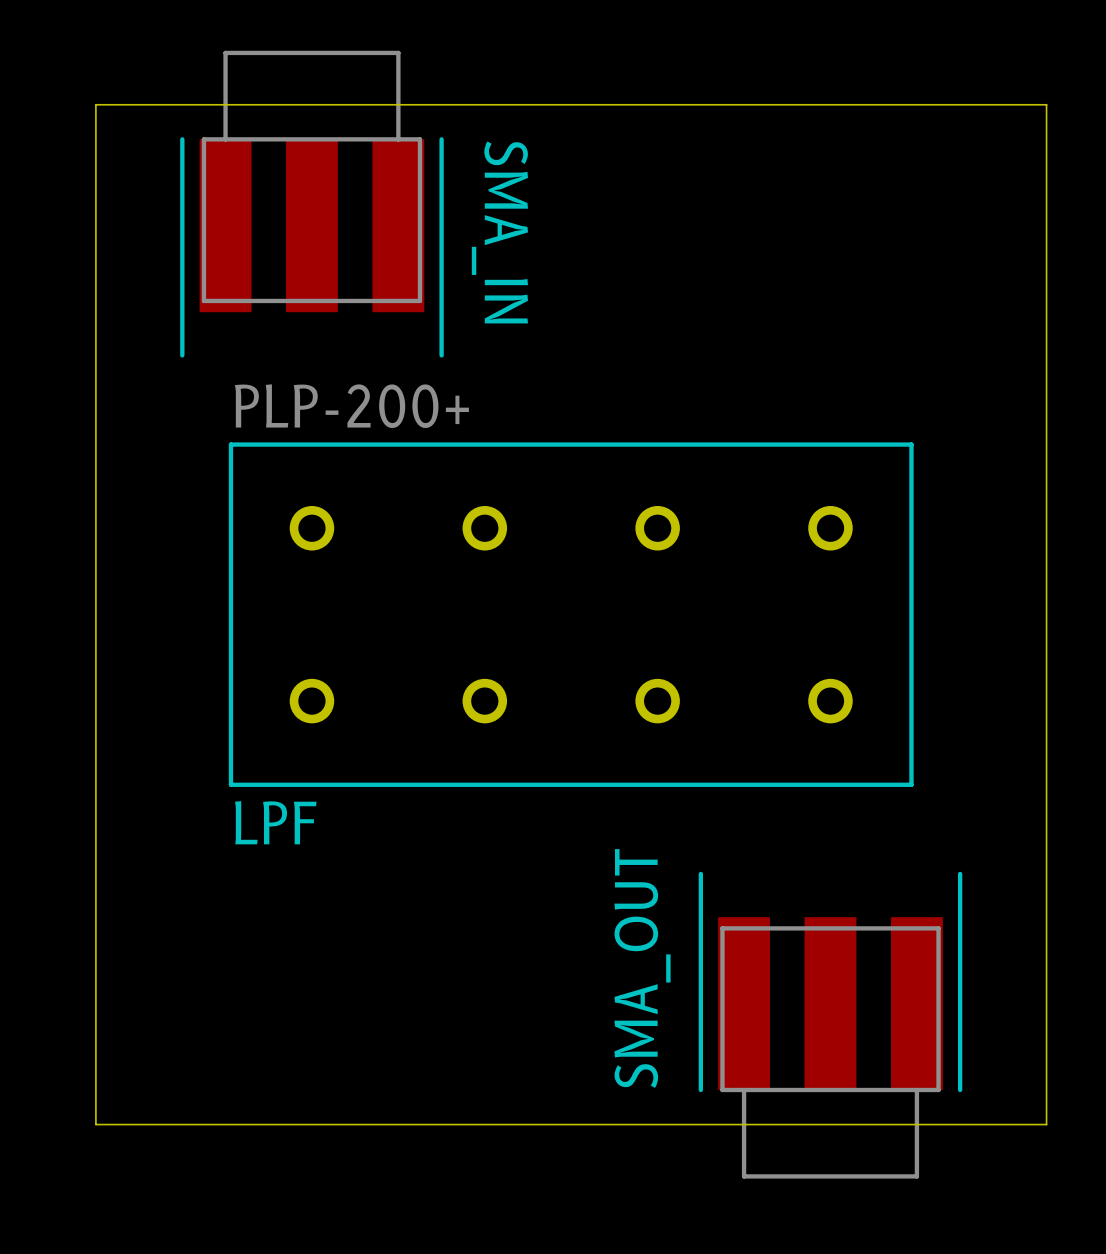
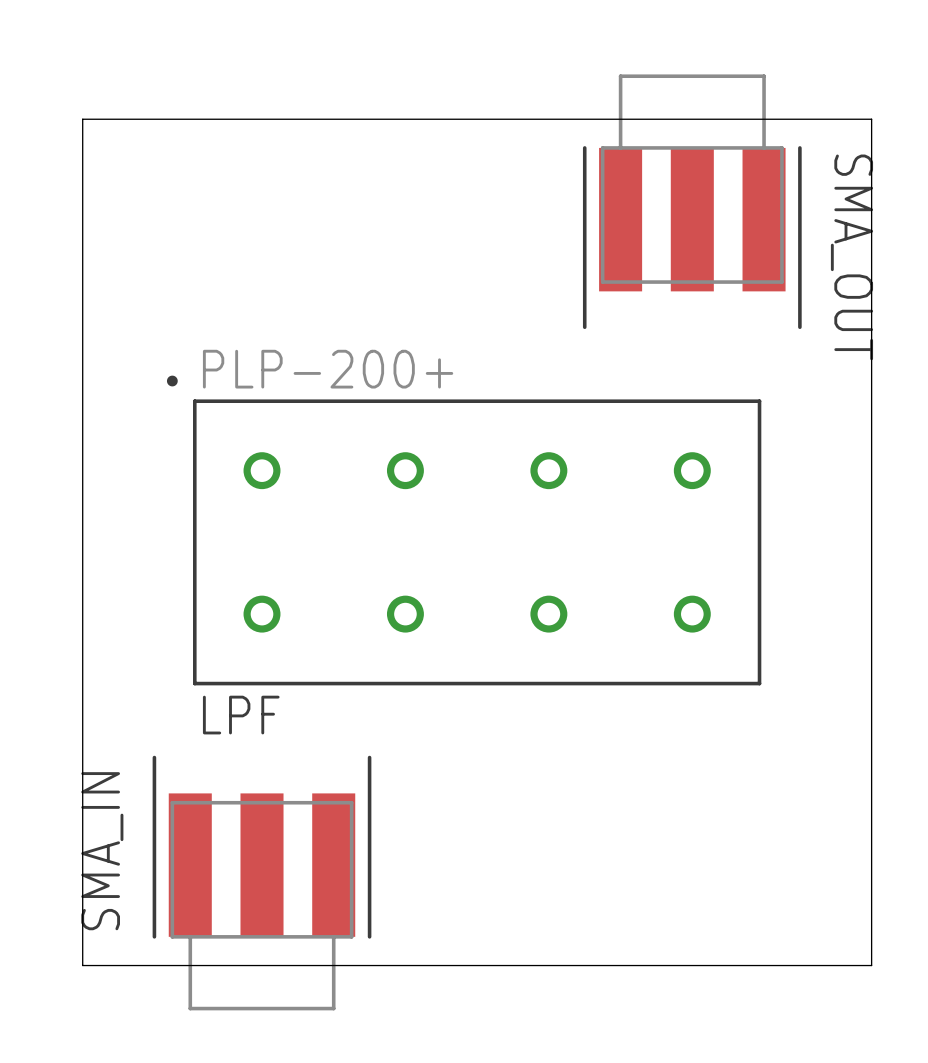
SMA_IN rotation: 0° (311, 204) -> 180° (262, 883)
SMA_IN position: (311, 204) -> (262, 883)
LPF footprint: [228, 442, 914, 787] -> [166, 375, 762, 686]
SMA_OUT rotation: 0° (830, 1025) -> 180° (692, 201)
SMA_OUT position: (830, 1025) -> (692, 201)

